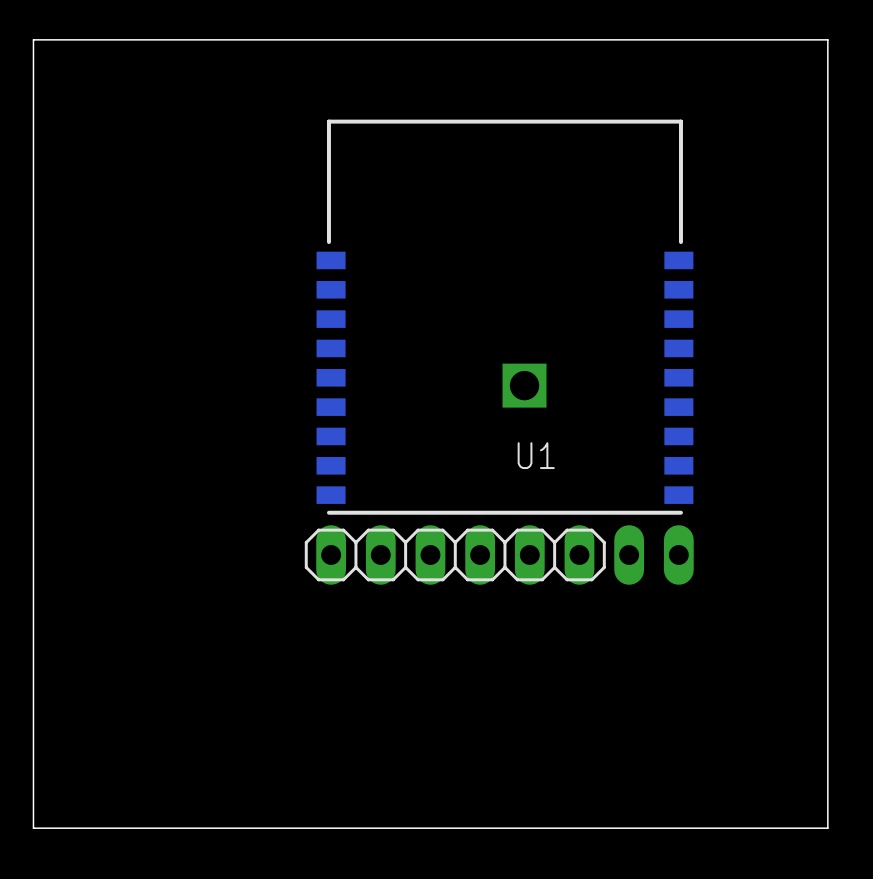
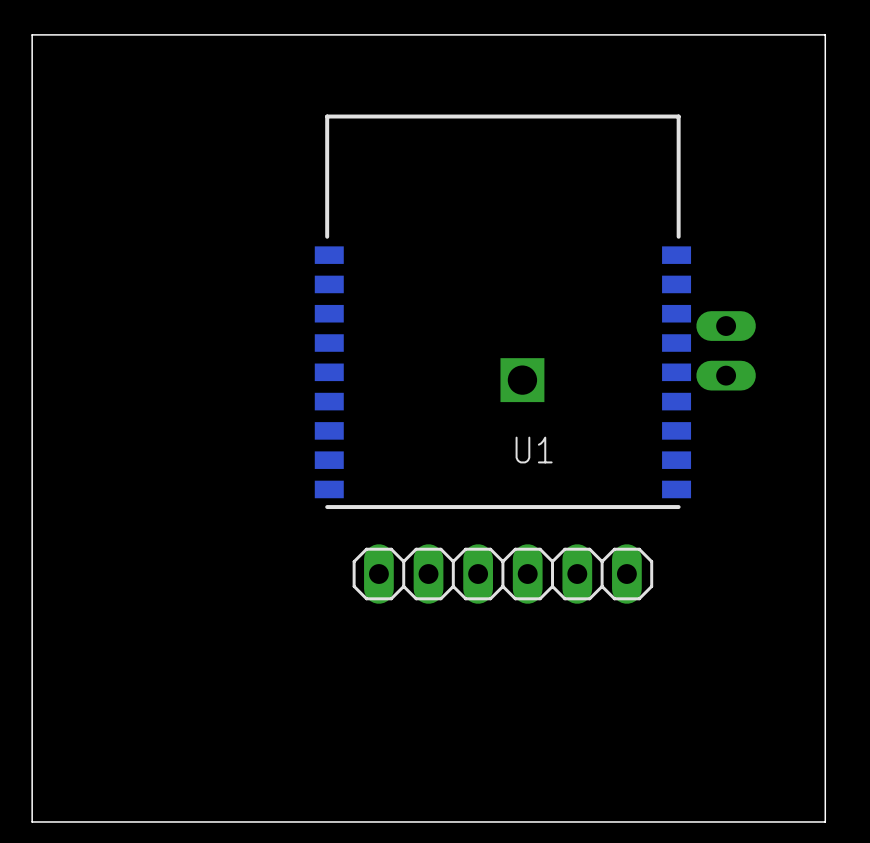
part position: (455, 554) -> (502, 574)
part rotation: 0° (653, 554) -> 90° clockwise (726, 350)
part position: (653, 554) -> (726, 350)

